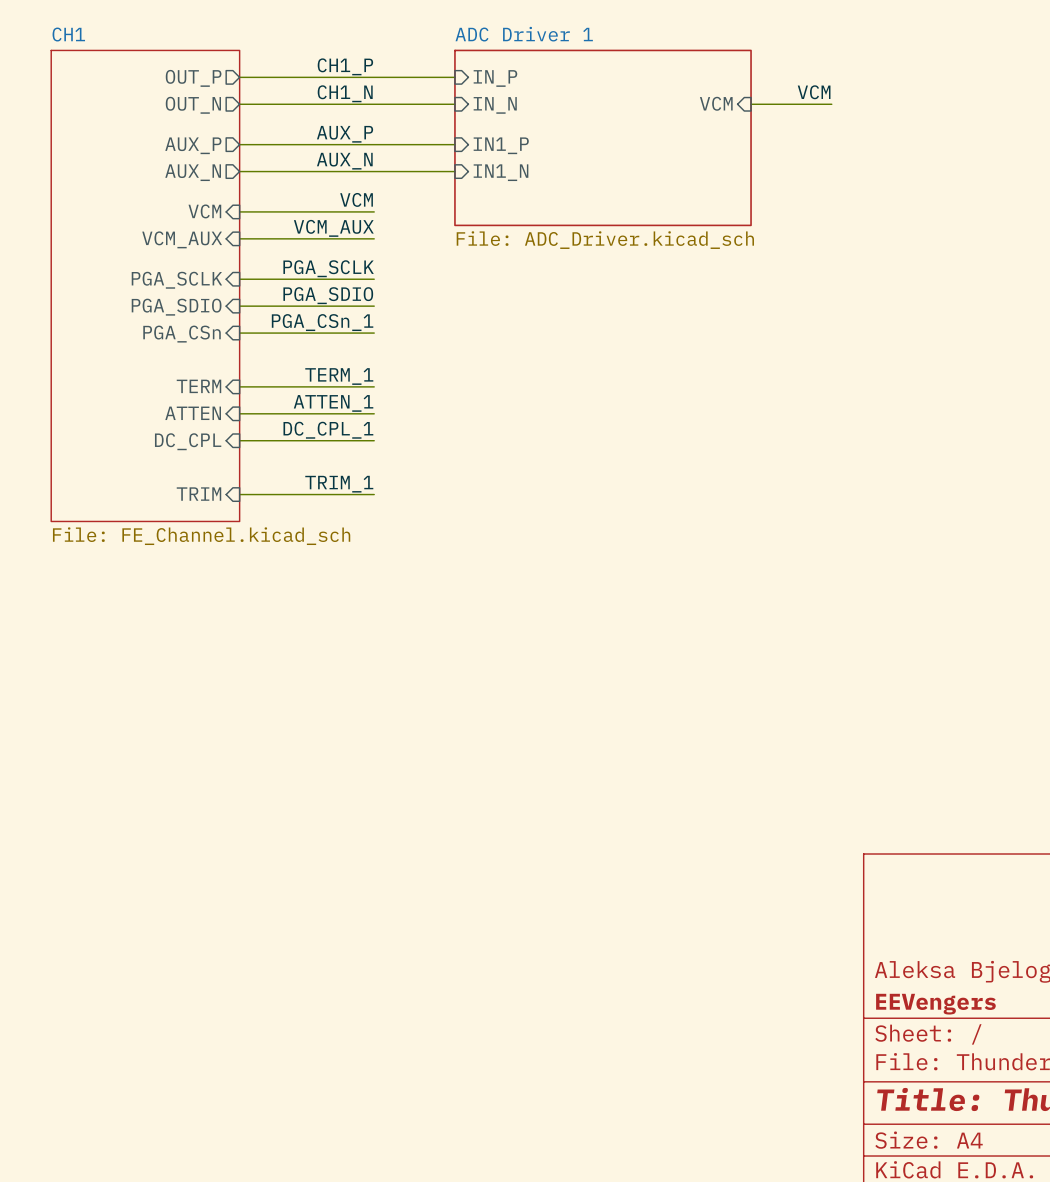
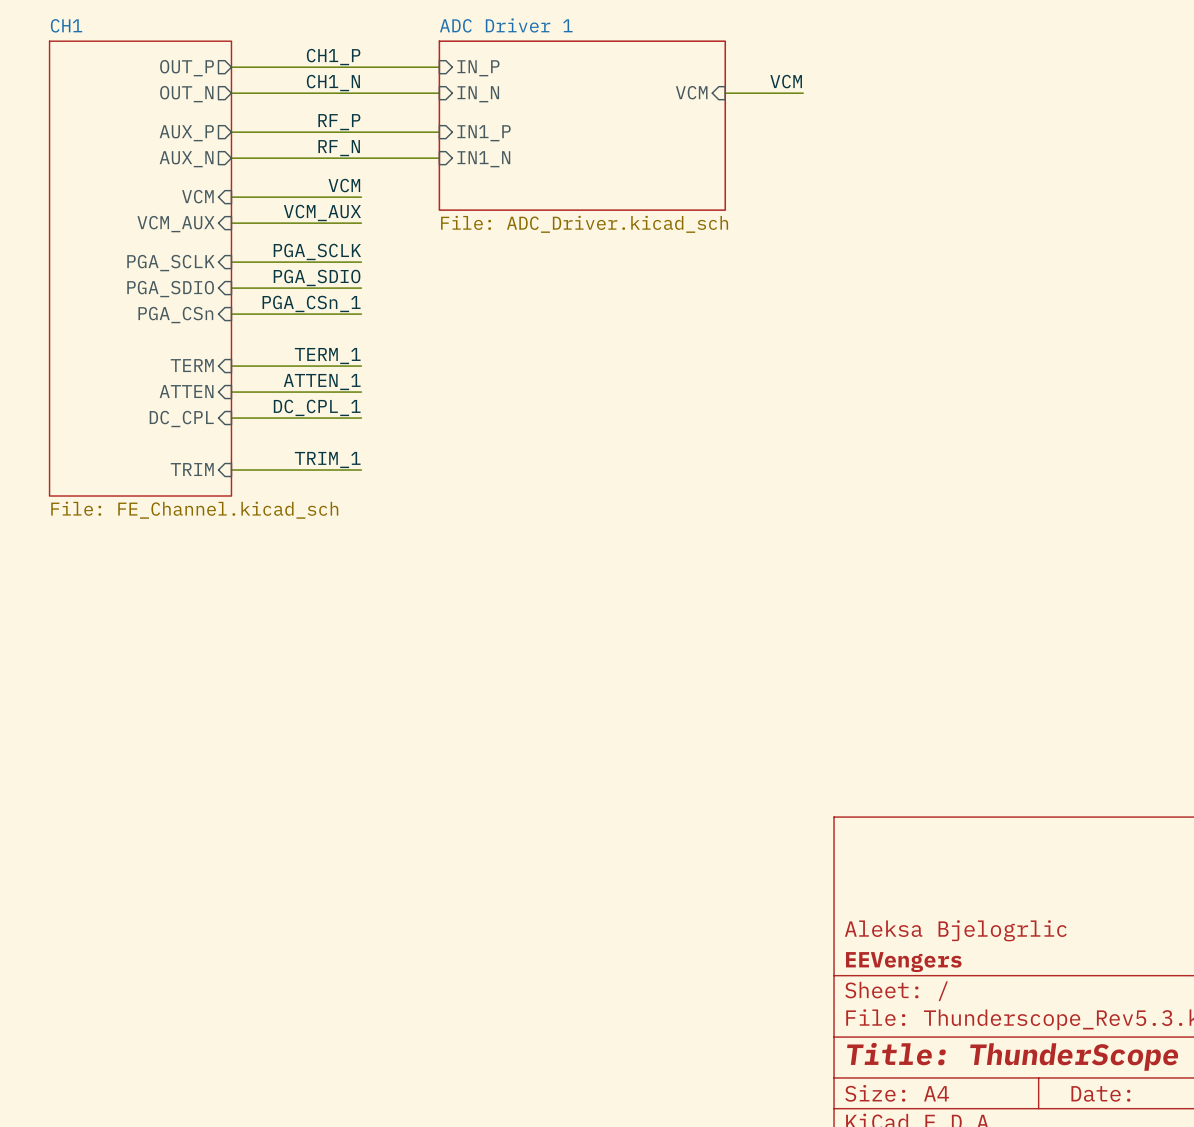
label: AUX_P (345, 134) -> RF_P (339, 122)
label: AUX_N (344, 161) -> RF_N (339, 148)

